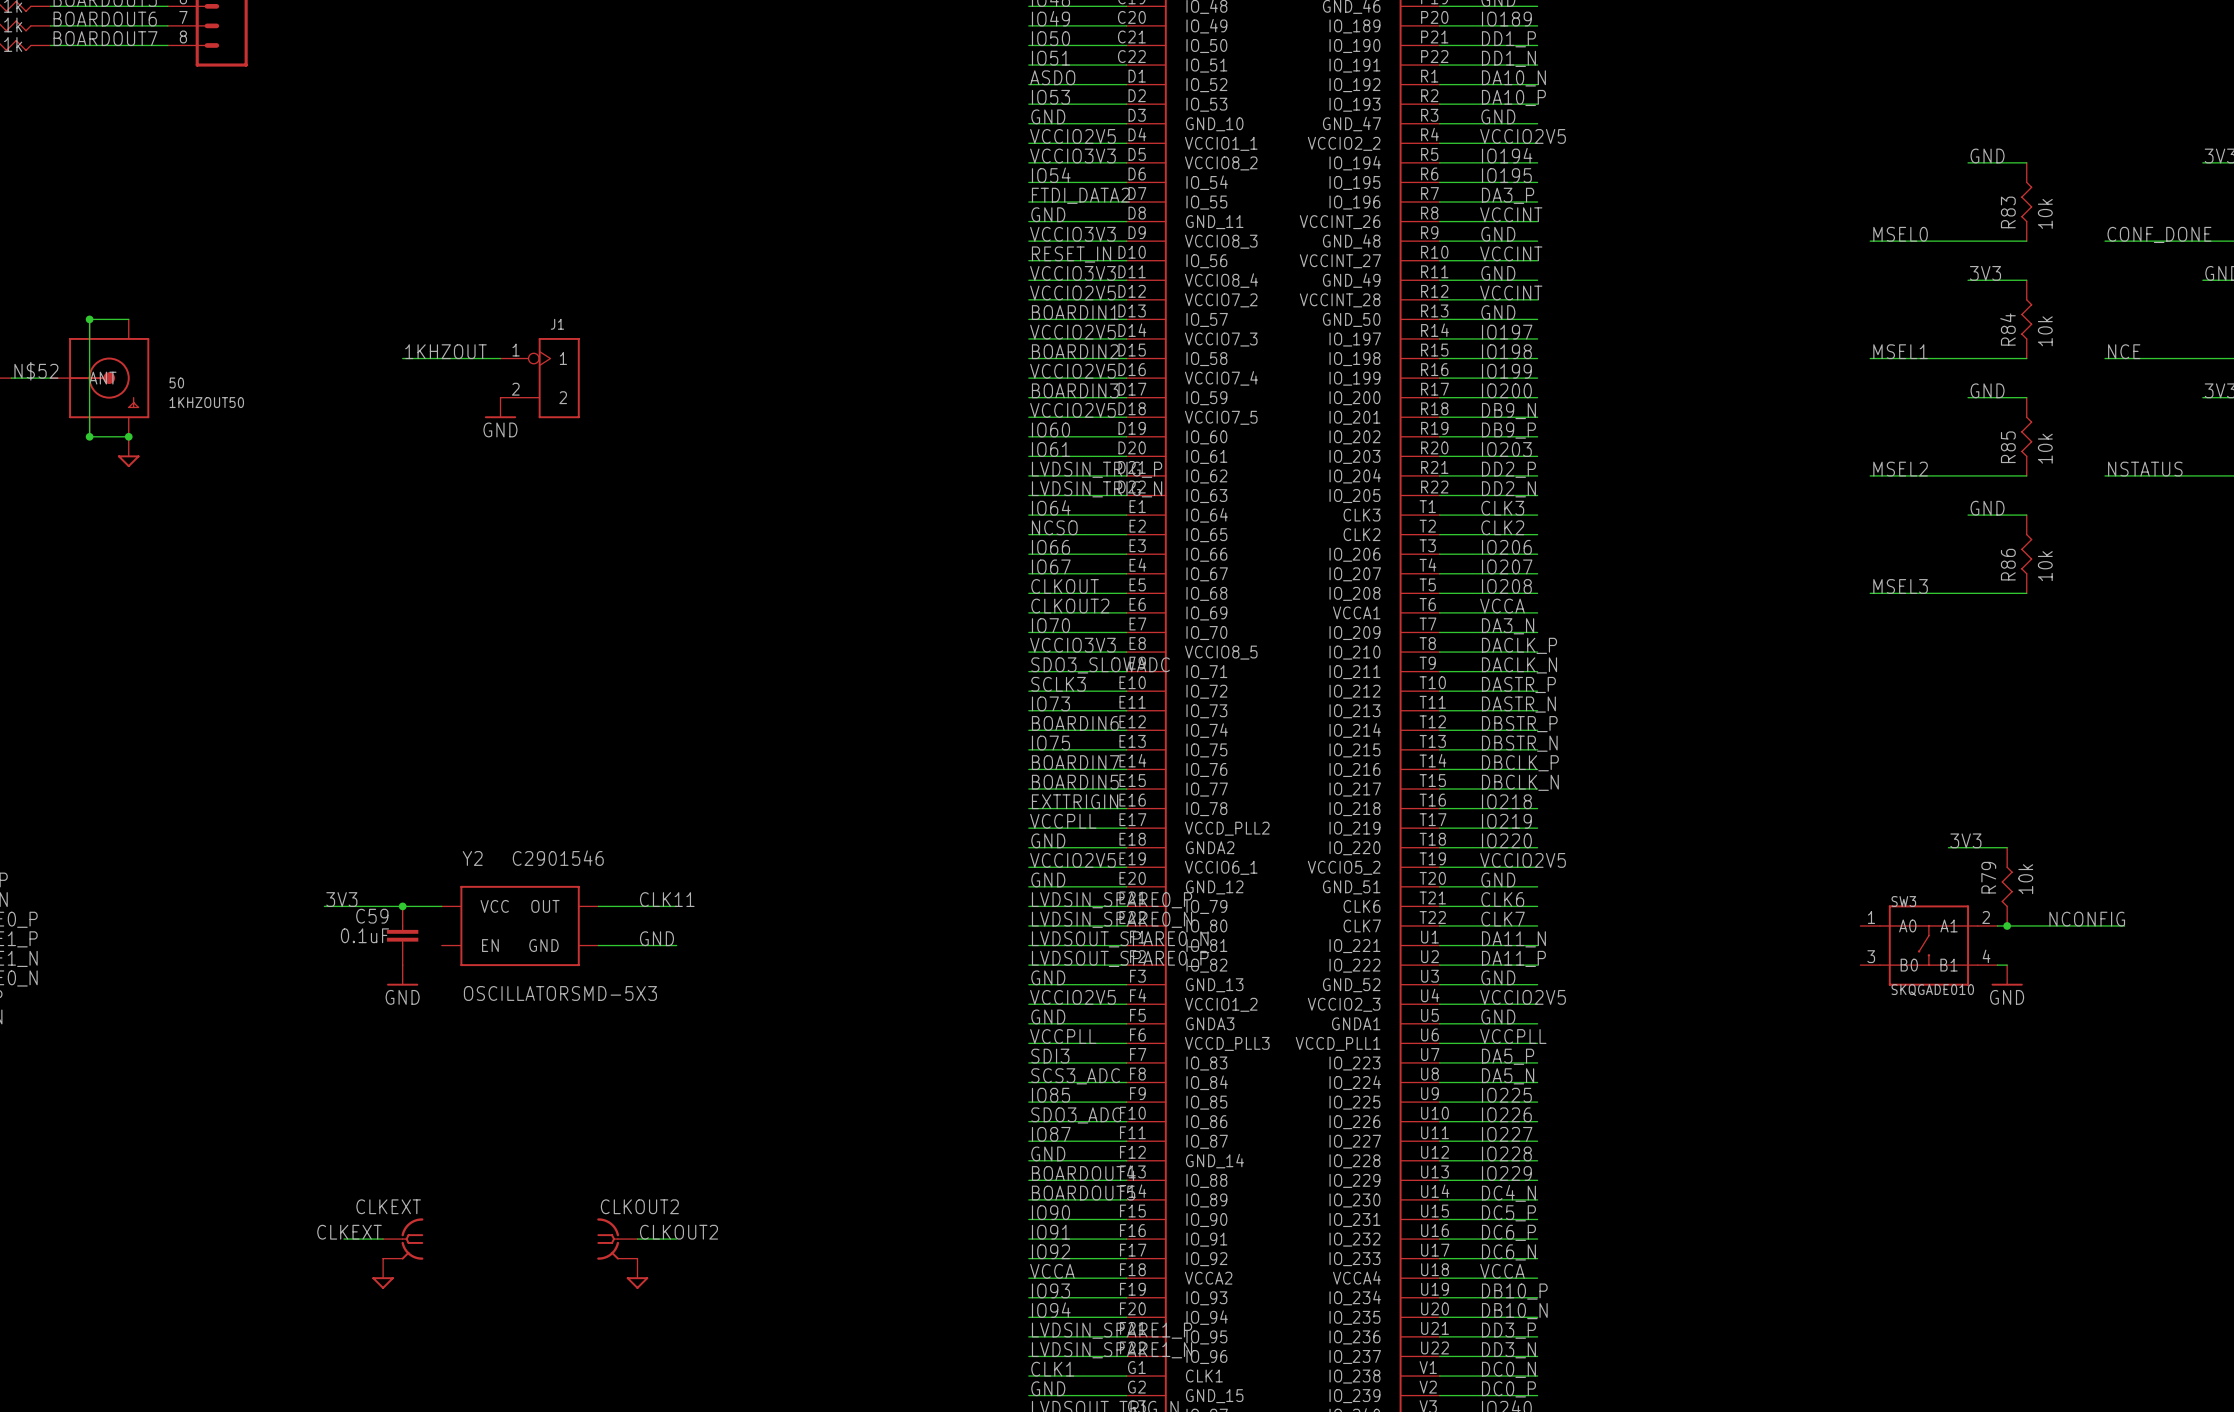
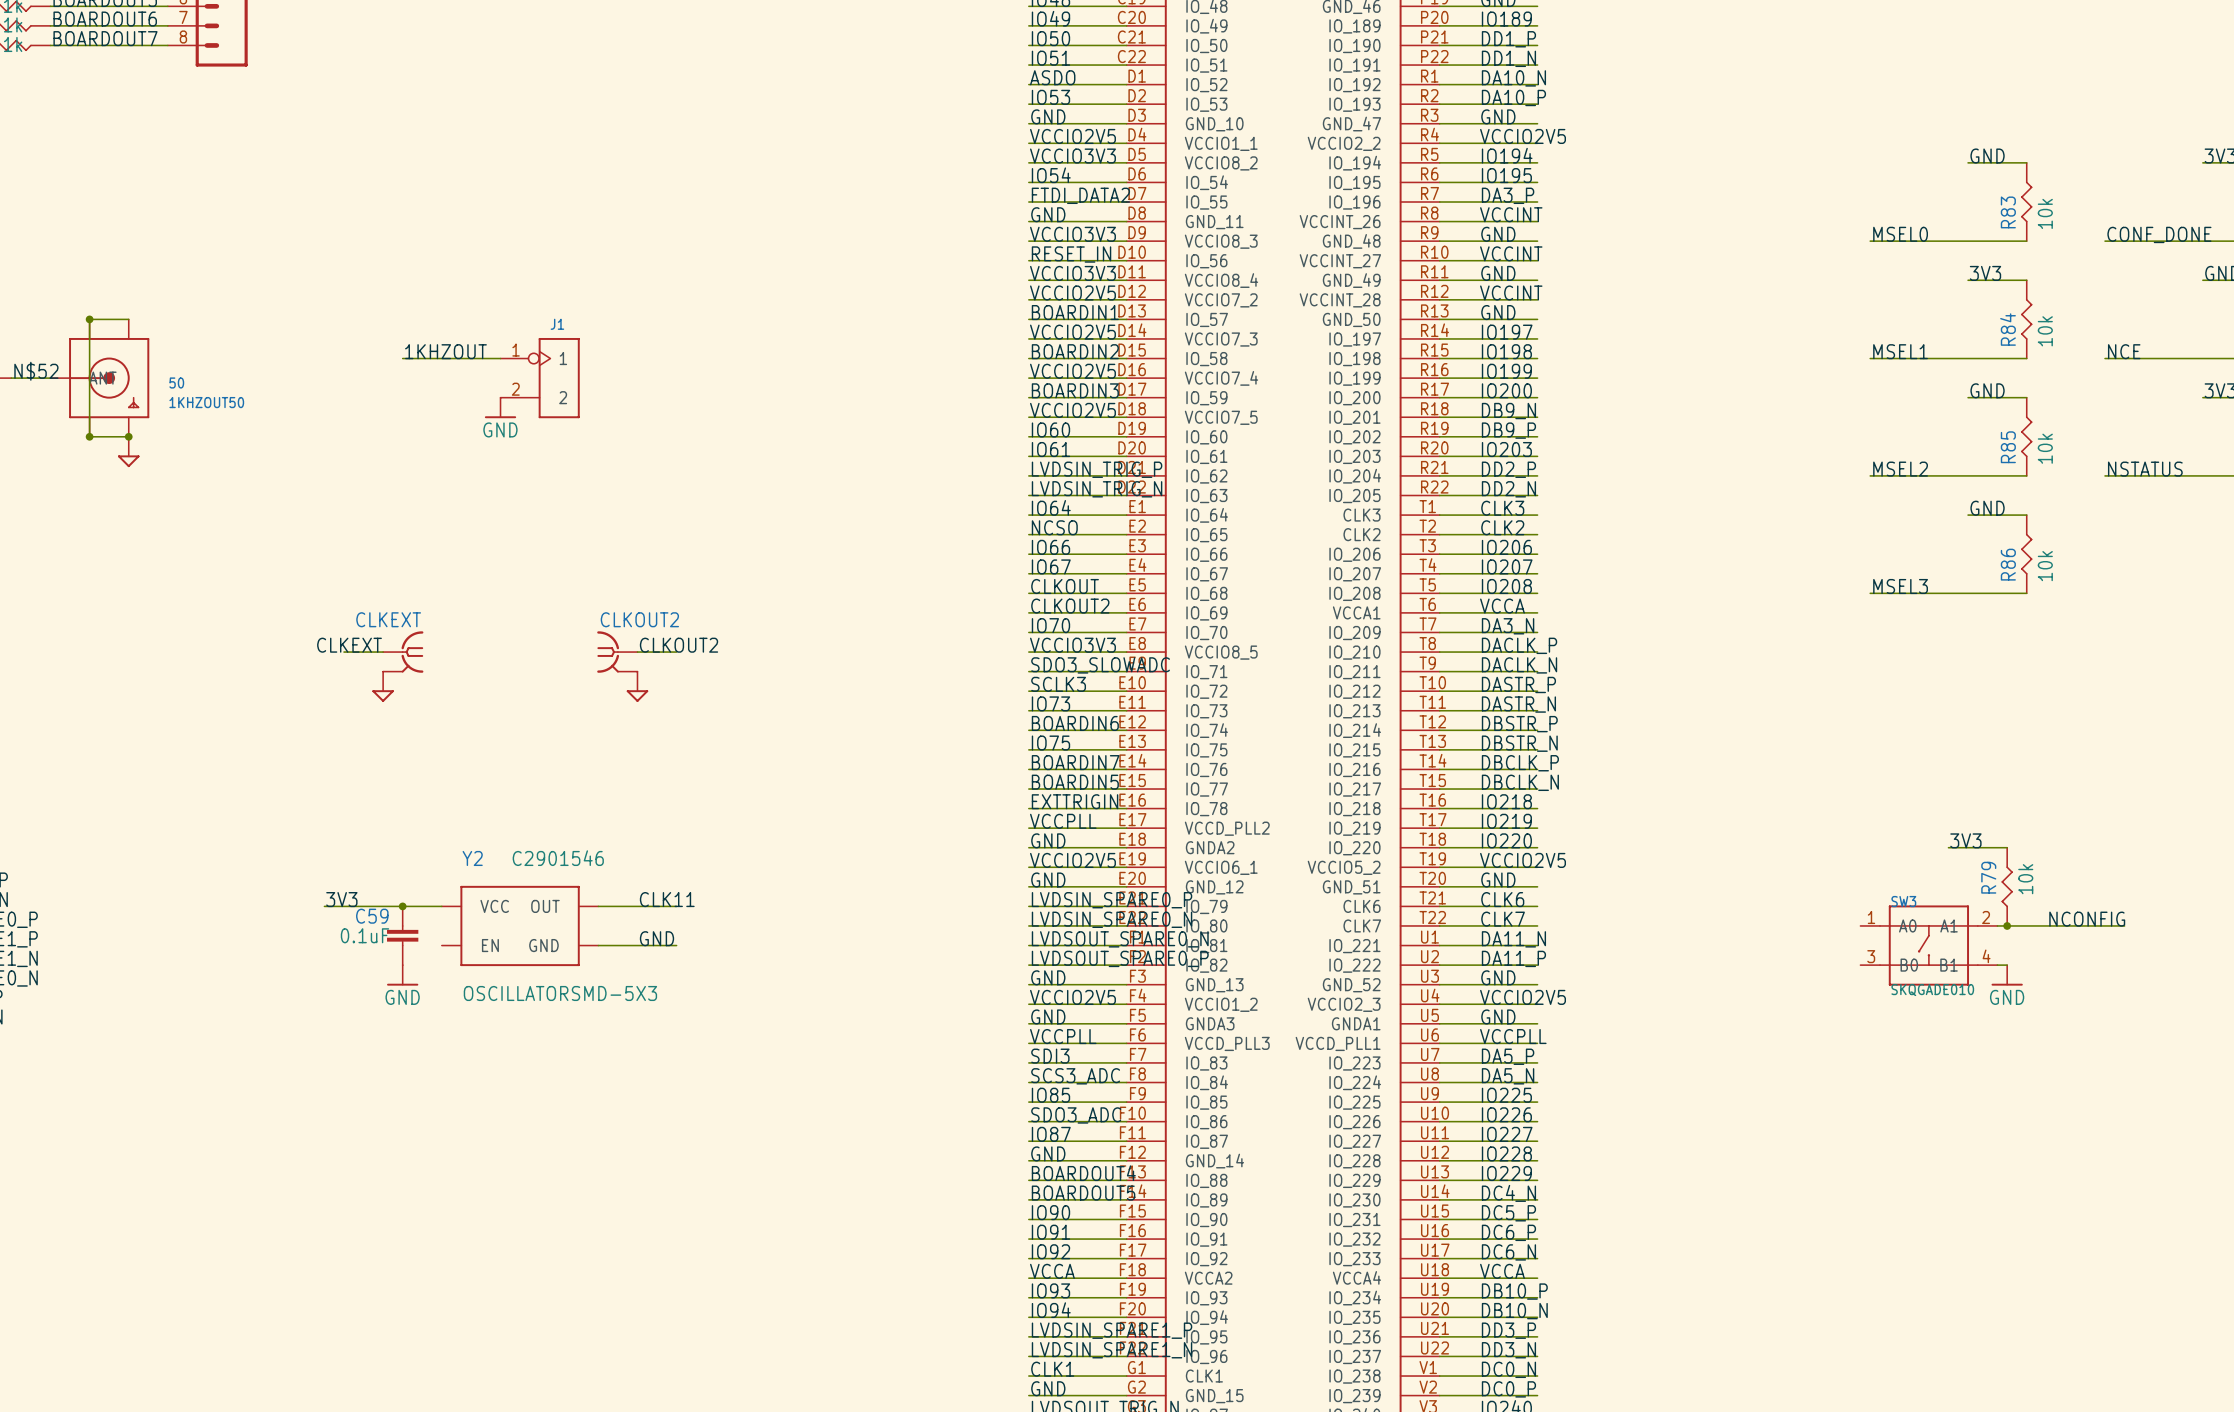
label: none -> CLKEXT (349, 645)
label: none -> CLKOUT2 (679, 645)
wire: none -> (343, 652) (383, 652)
CLKEXT: none -> (403, 652)
wire: none -> (637, 652) (676, 652)
power symbol: none -> (383, 686)
power symbol: none -> (637, 686)
label: CLKEXT (349, 1232) -> none
label: CLKOUT2 (679, 1232) -> none
wire: (343, 1239) (383, 1239) -> none
CLKEXT: (403, 1239) -> none
CLKOUT2 position: (617, 1239) -> (617, 652)
wire: (637, 1239) (676, 1239) -> none
power symbol: (383, 1273) -> none
power symbol: (637, 1273) -> none

